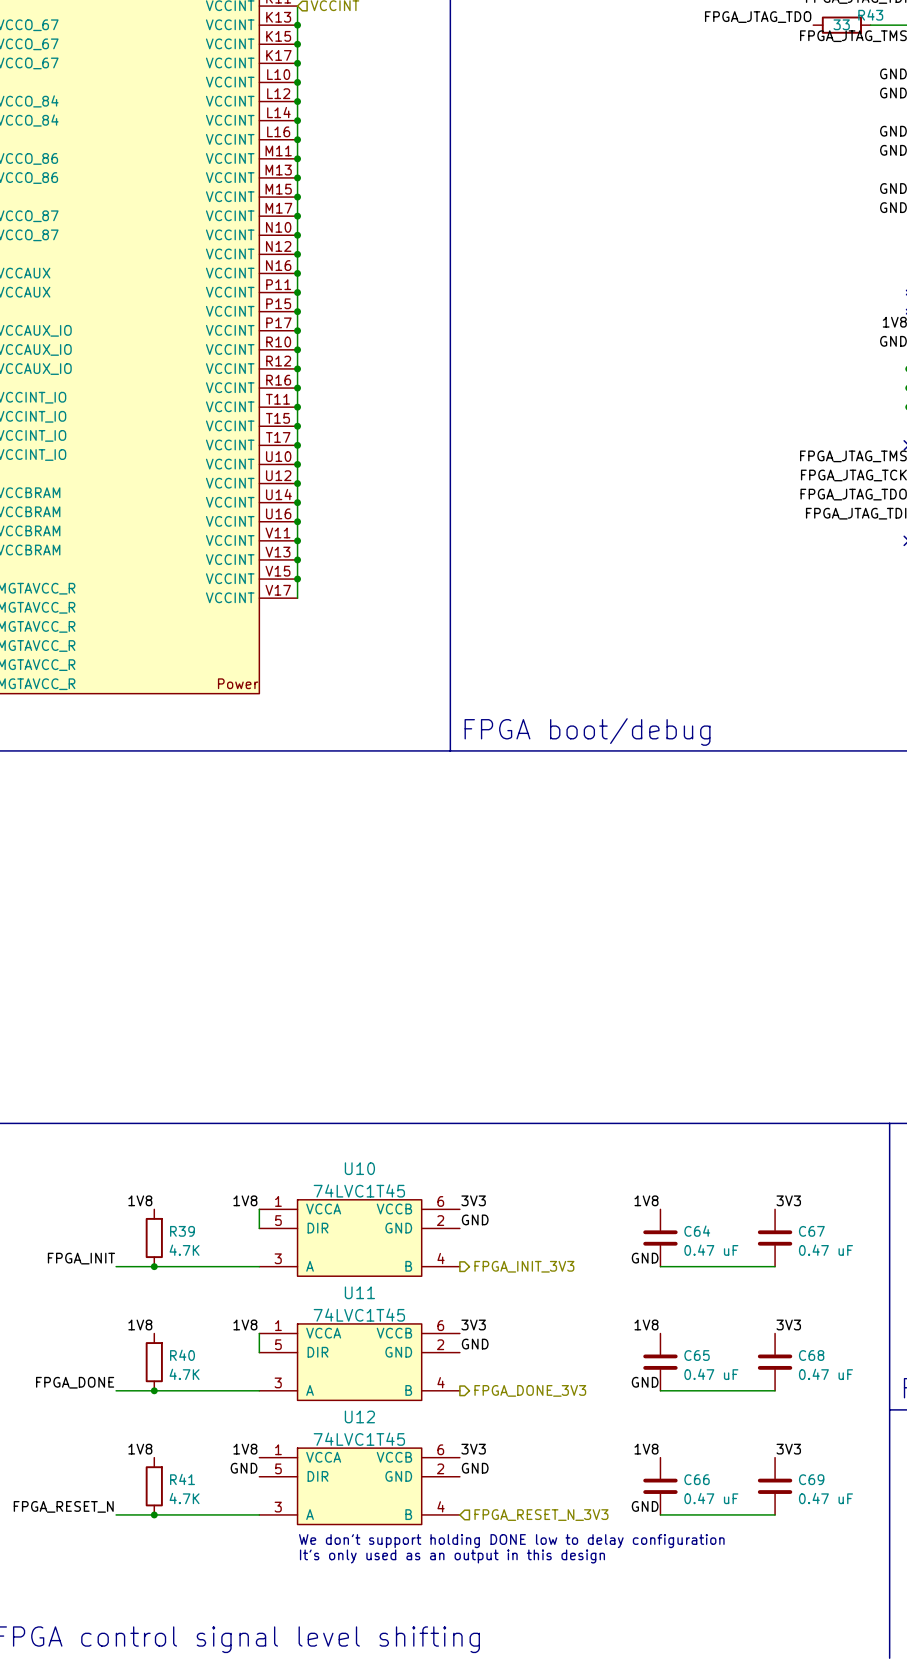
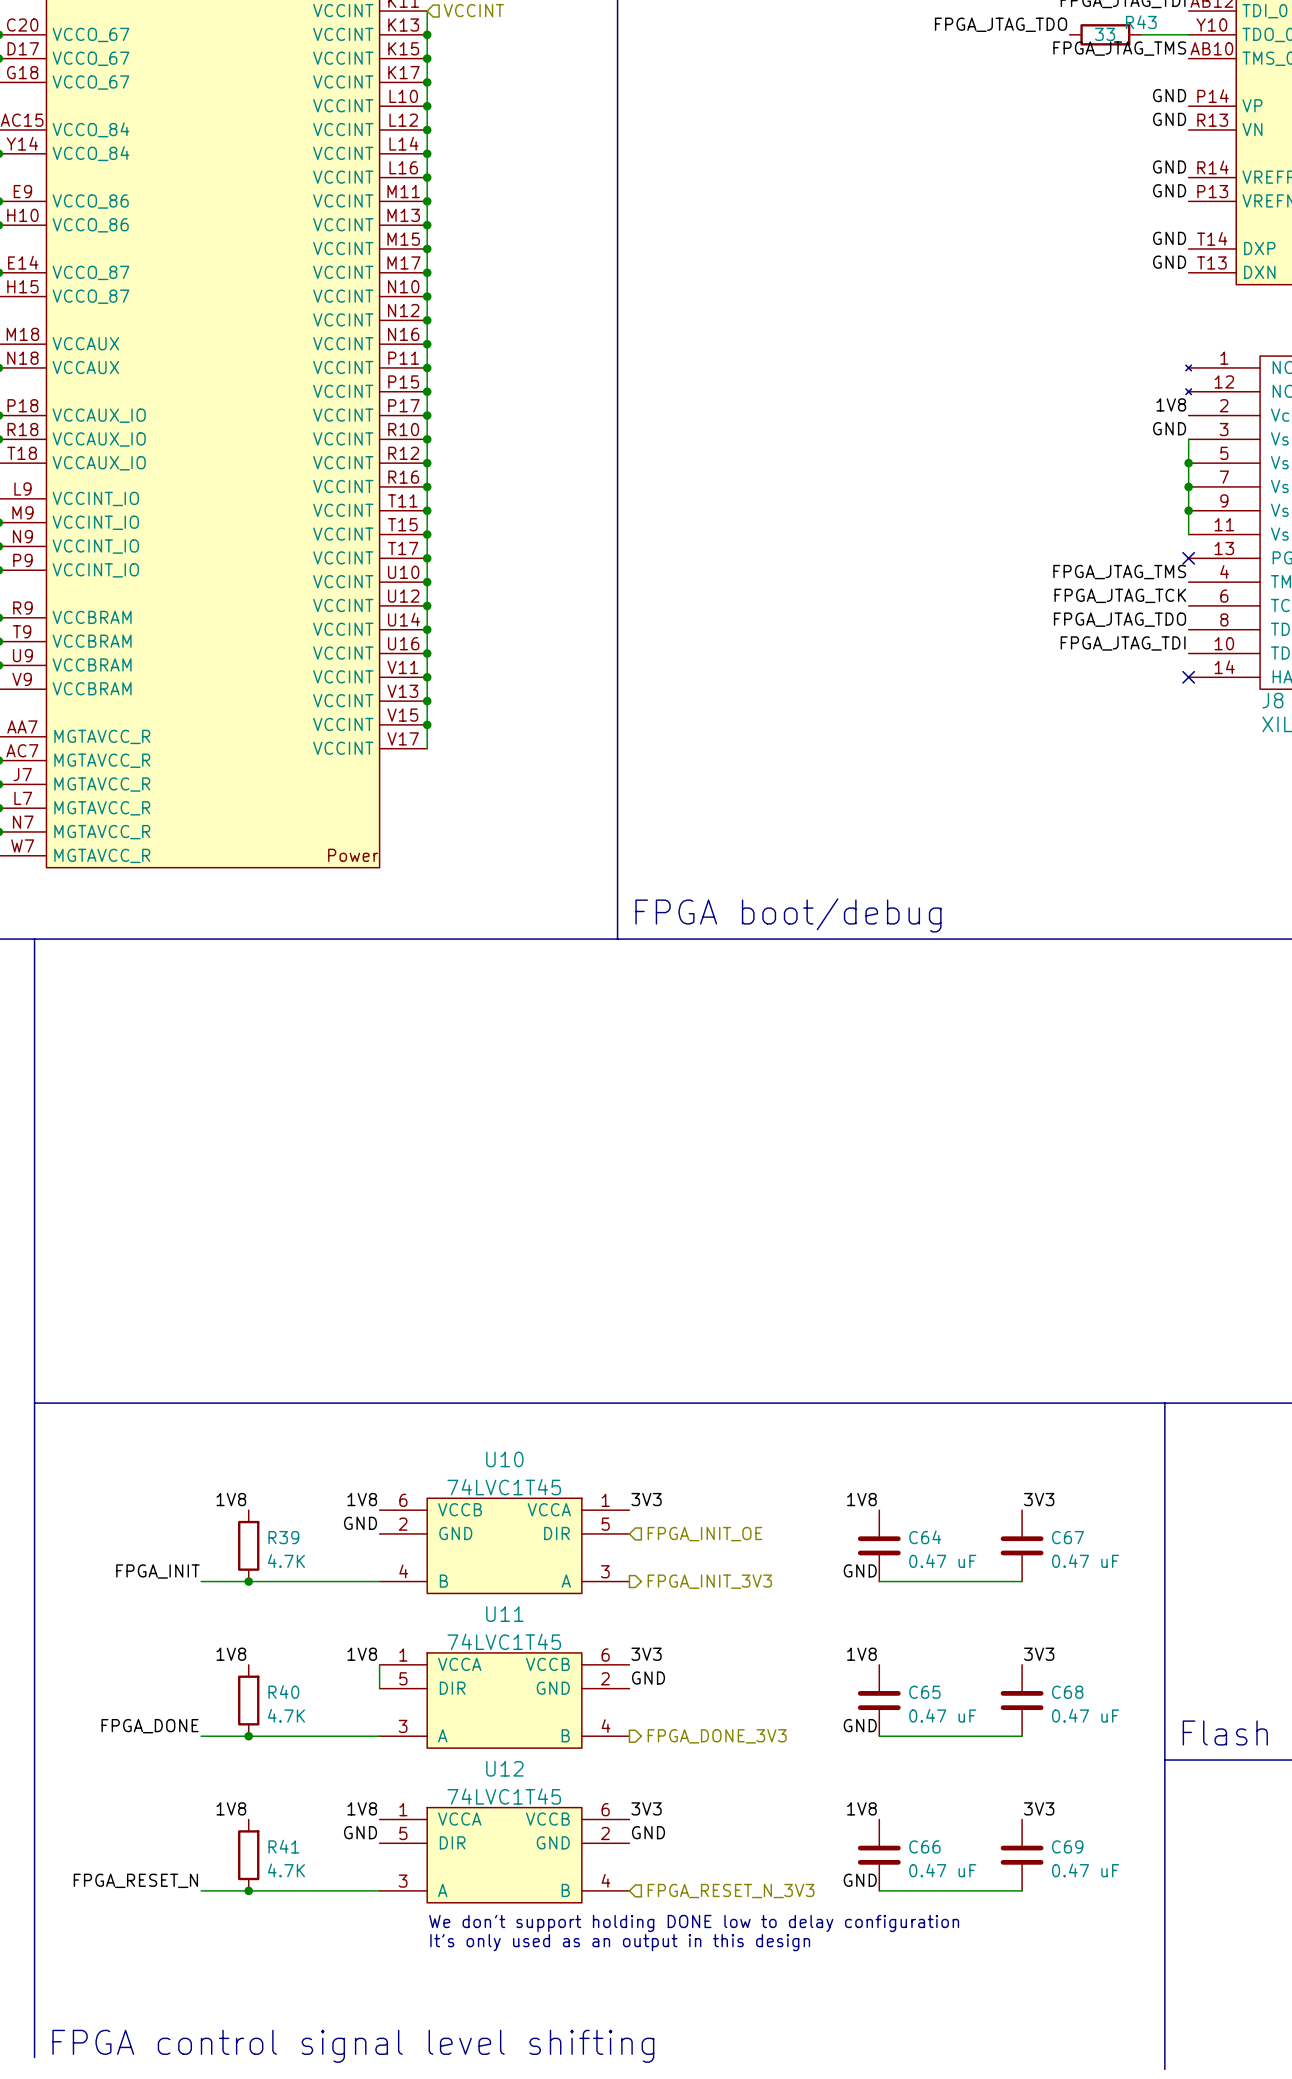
wire: (259, 1209) (259, 1228) -> none
label: none -> GND (360, 1523)
label: GND (475, 1219) -> none
hierarchical label: none -> FPGA_INIT_OE (704, 1534)
U10 flip: as is (359, 1238) -> left-right (504, 1545)

